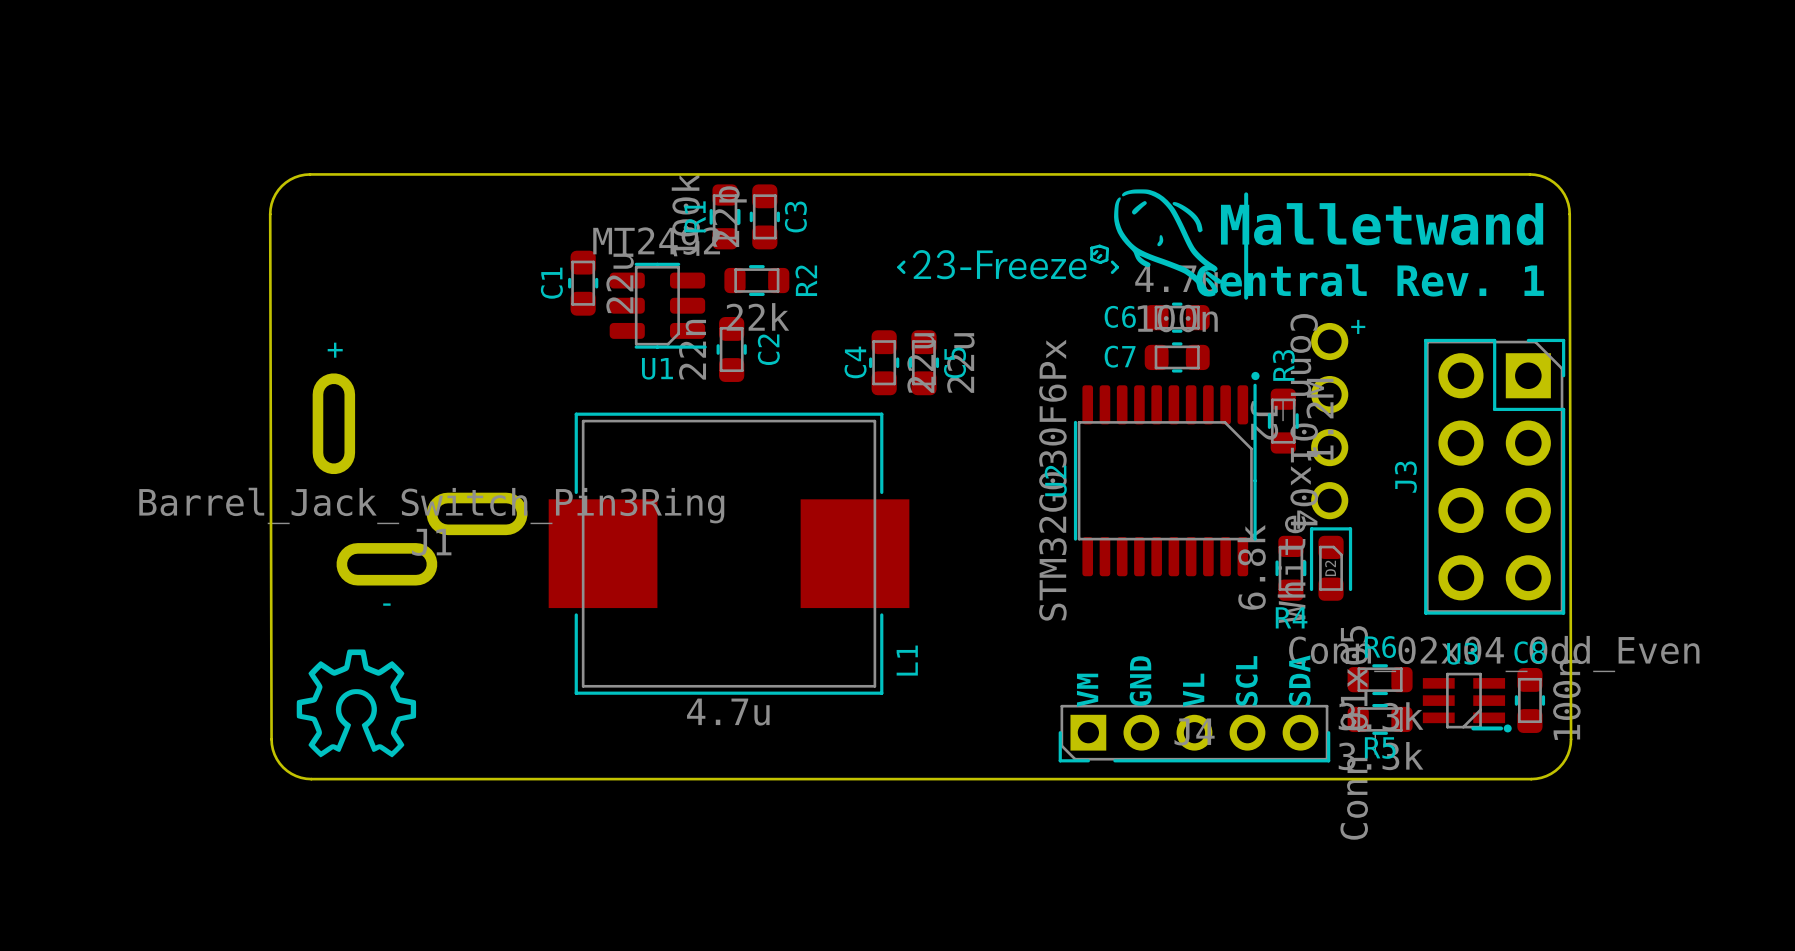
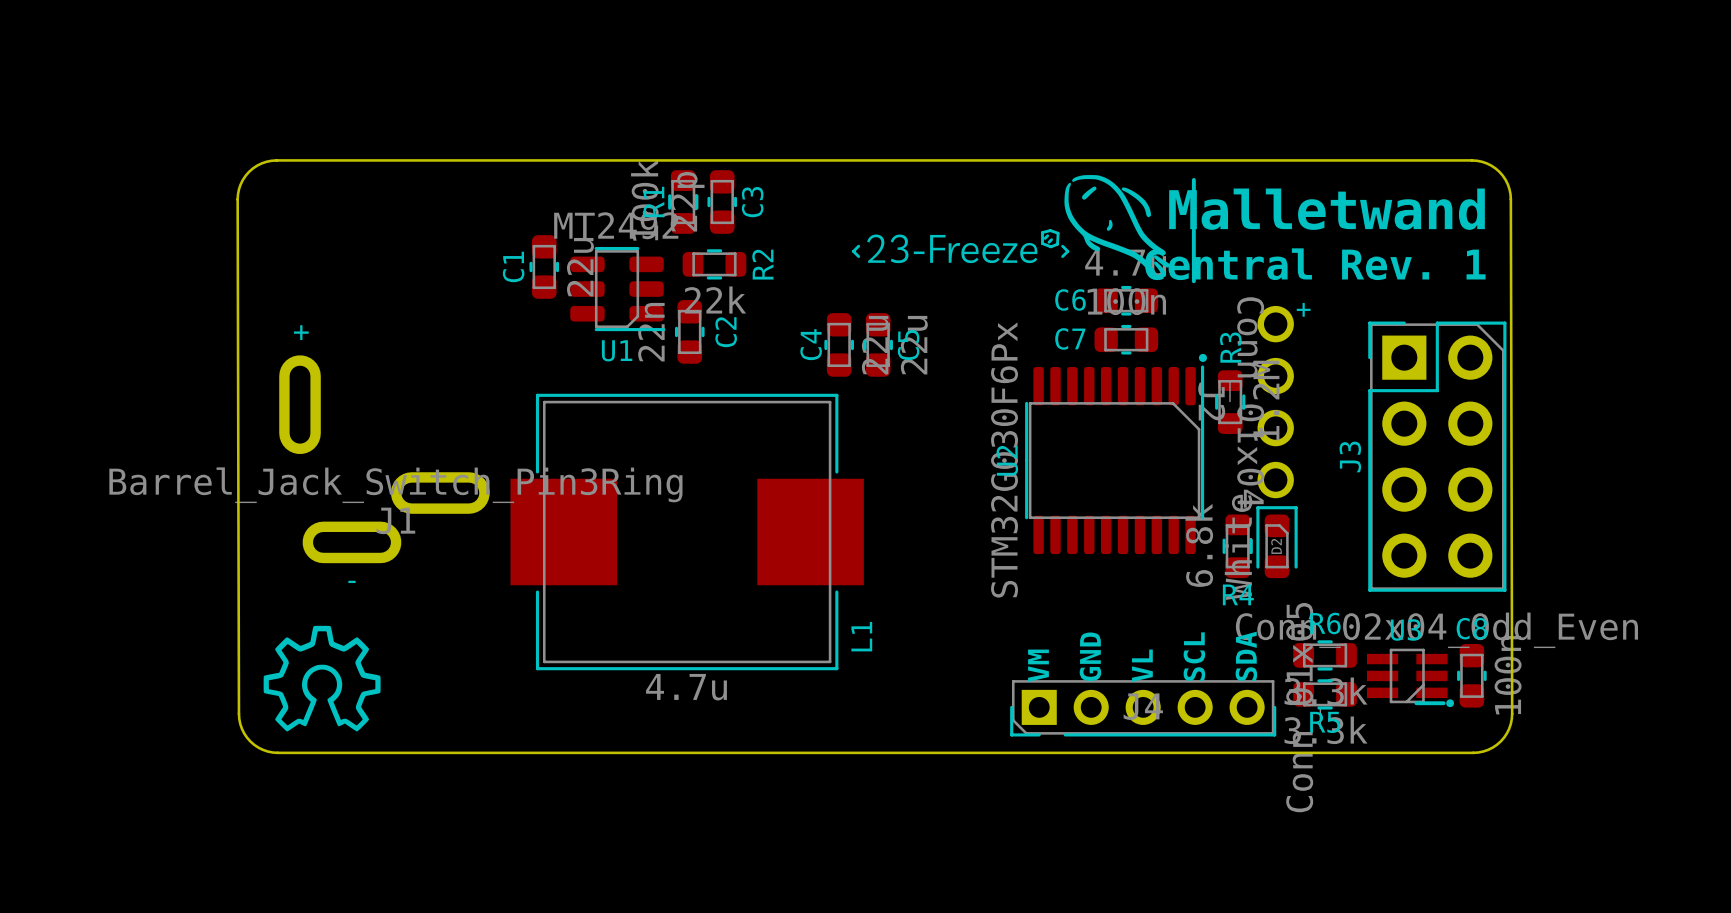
J3 footprint: [1424, 338, 1566, 615] -> [1368, 321, 1507, 592]

